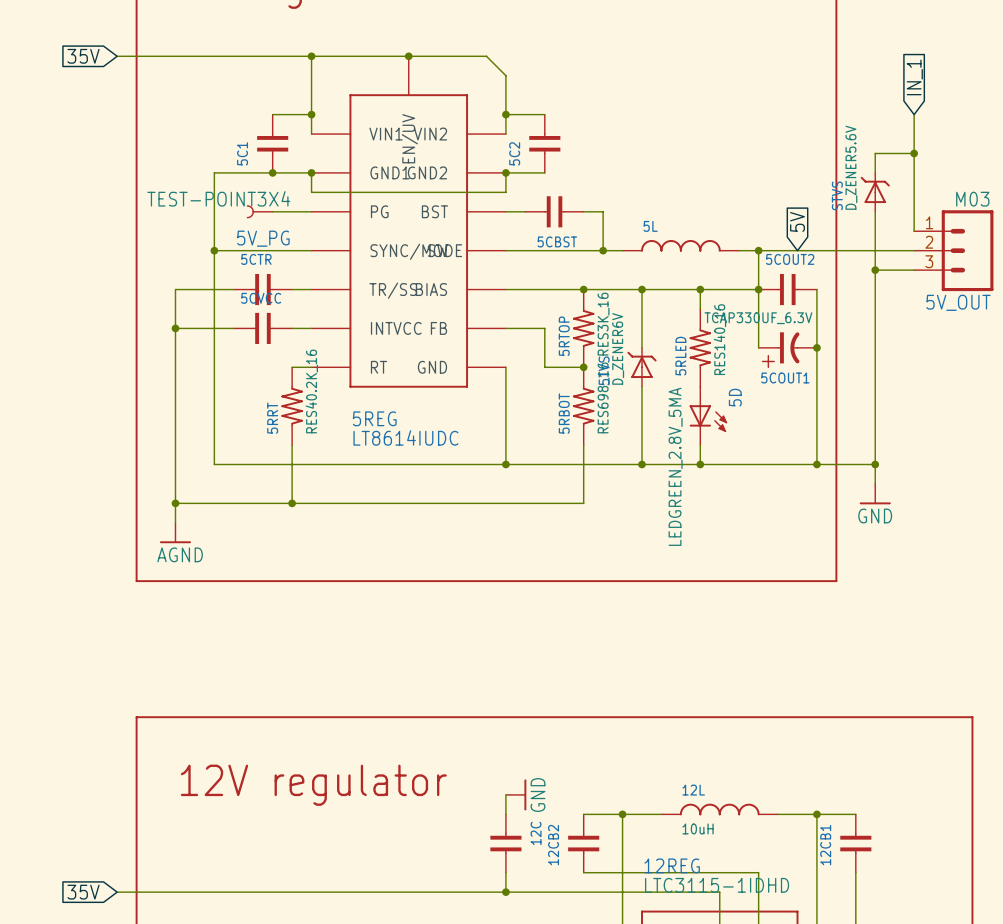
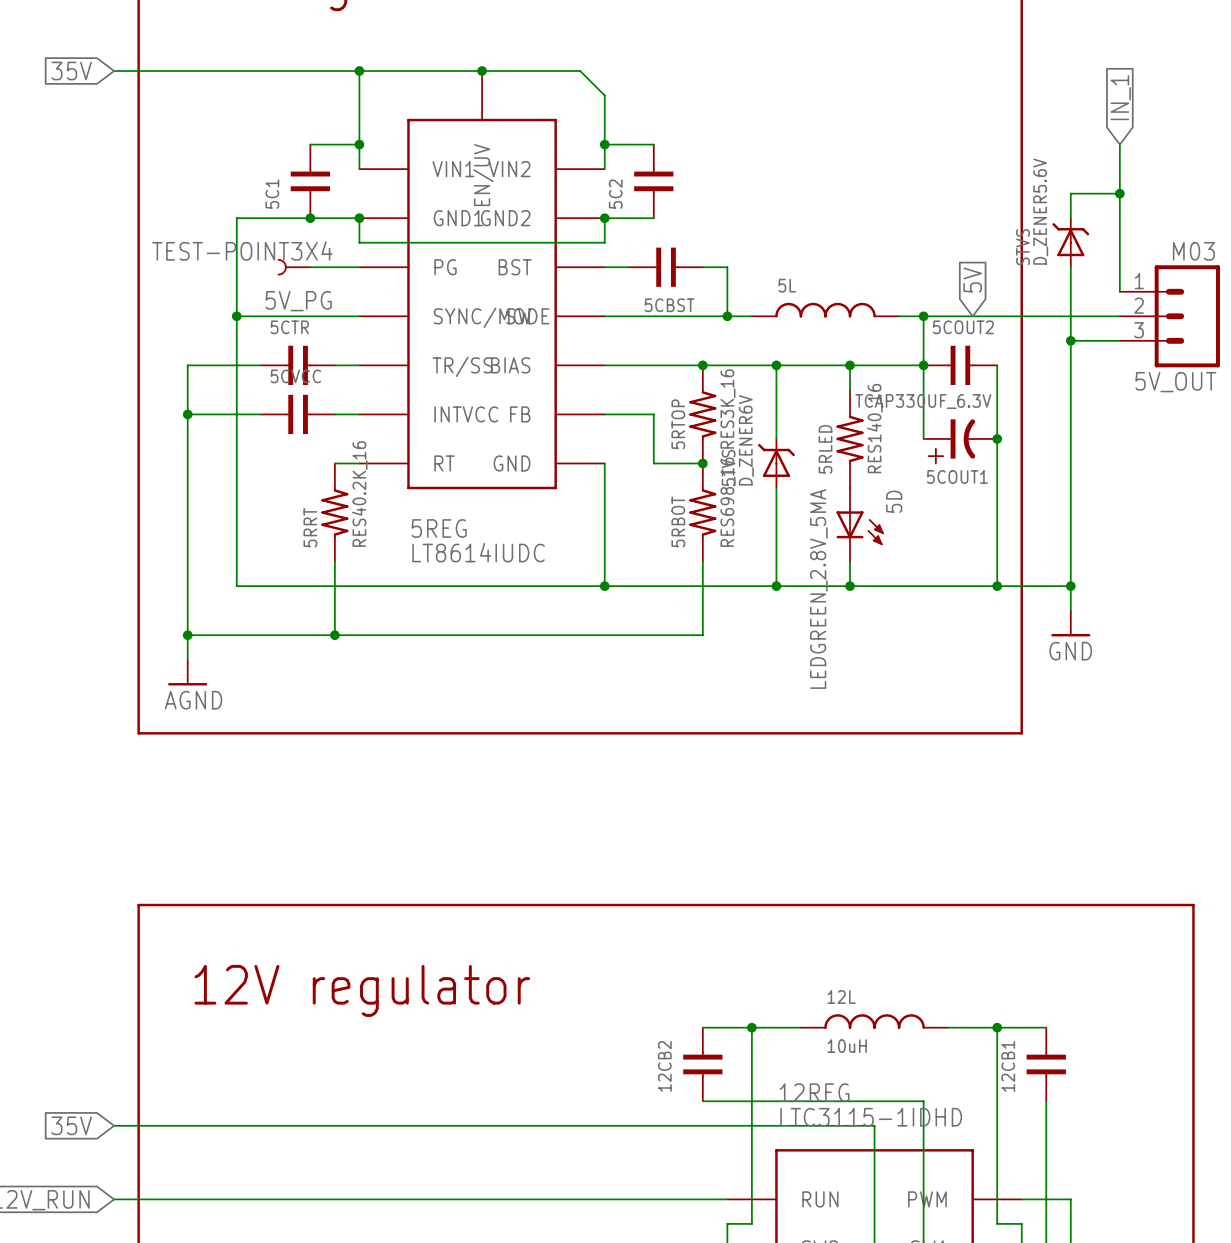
wire: (505, 794) (505, 814) -> none
power symbol: GND (516, 794) -> none
12C: (505, 843) -> none
wire: (505, 872) (505, 892) -> none
junction: (505, 892) -> none

